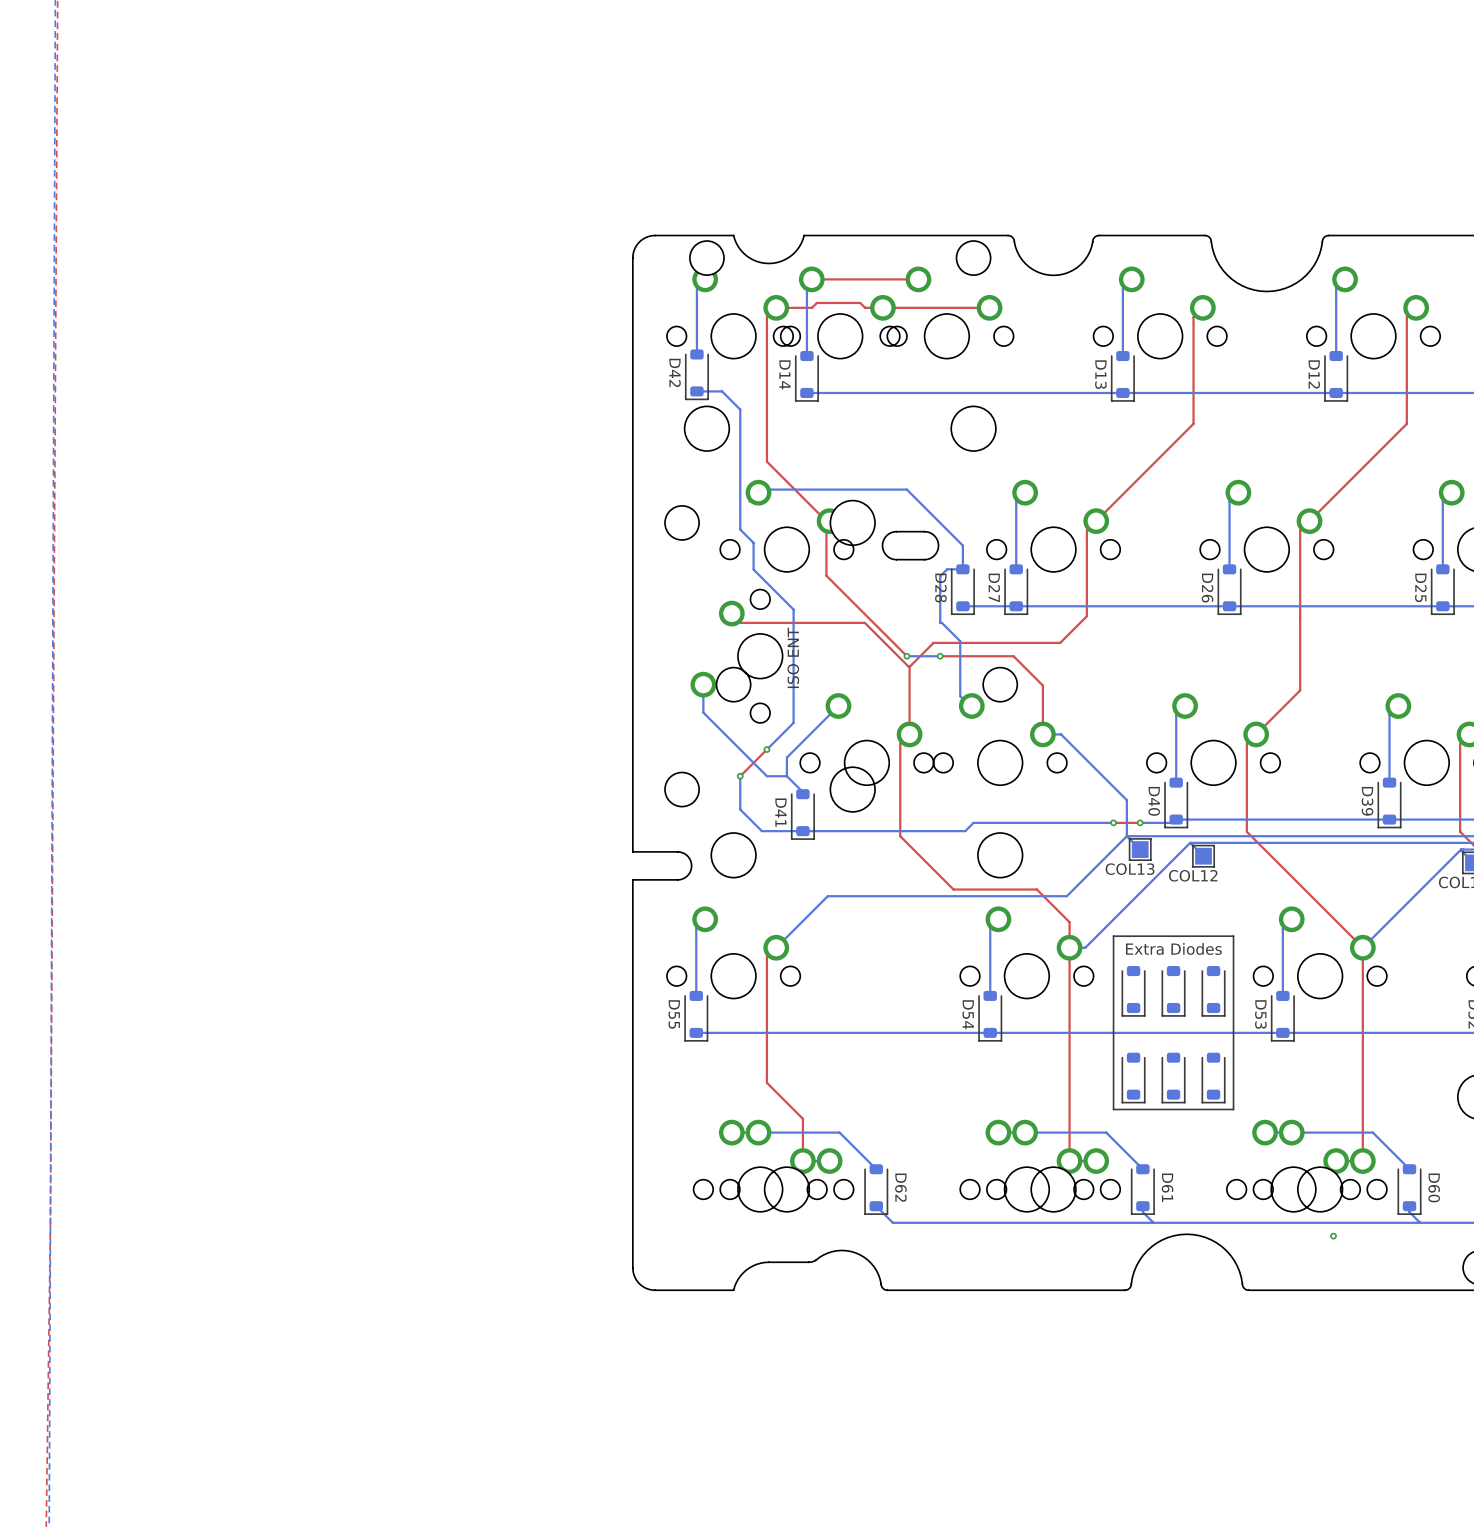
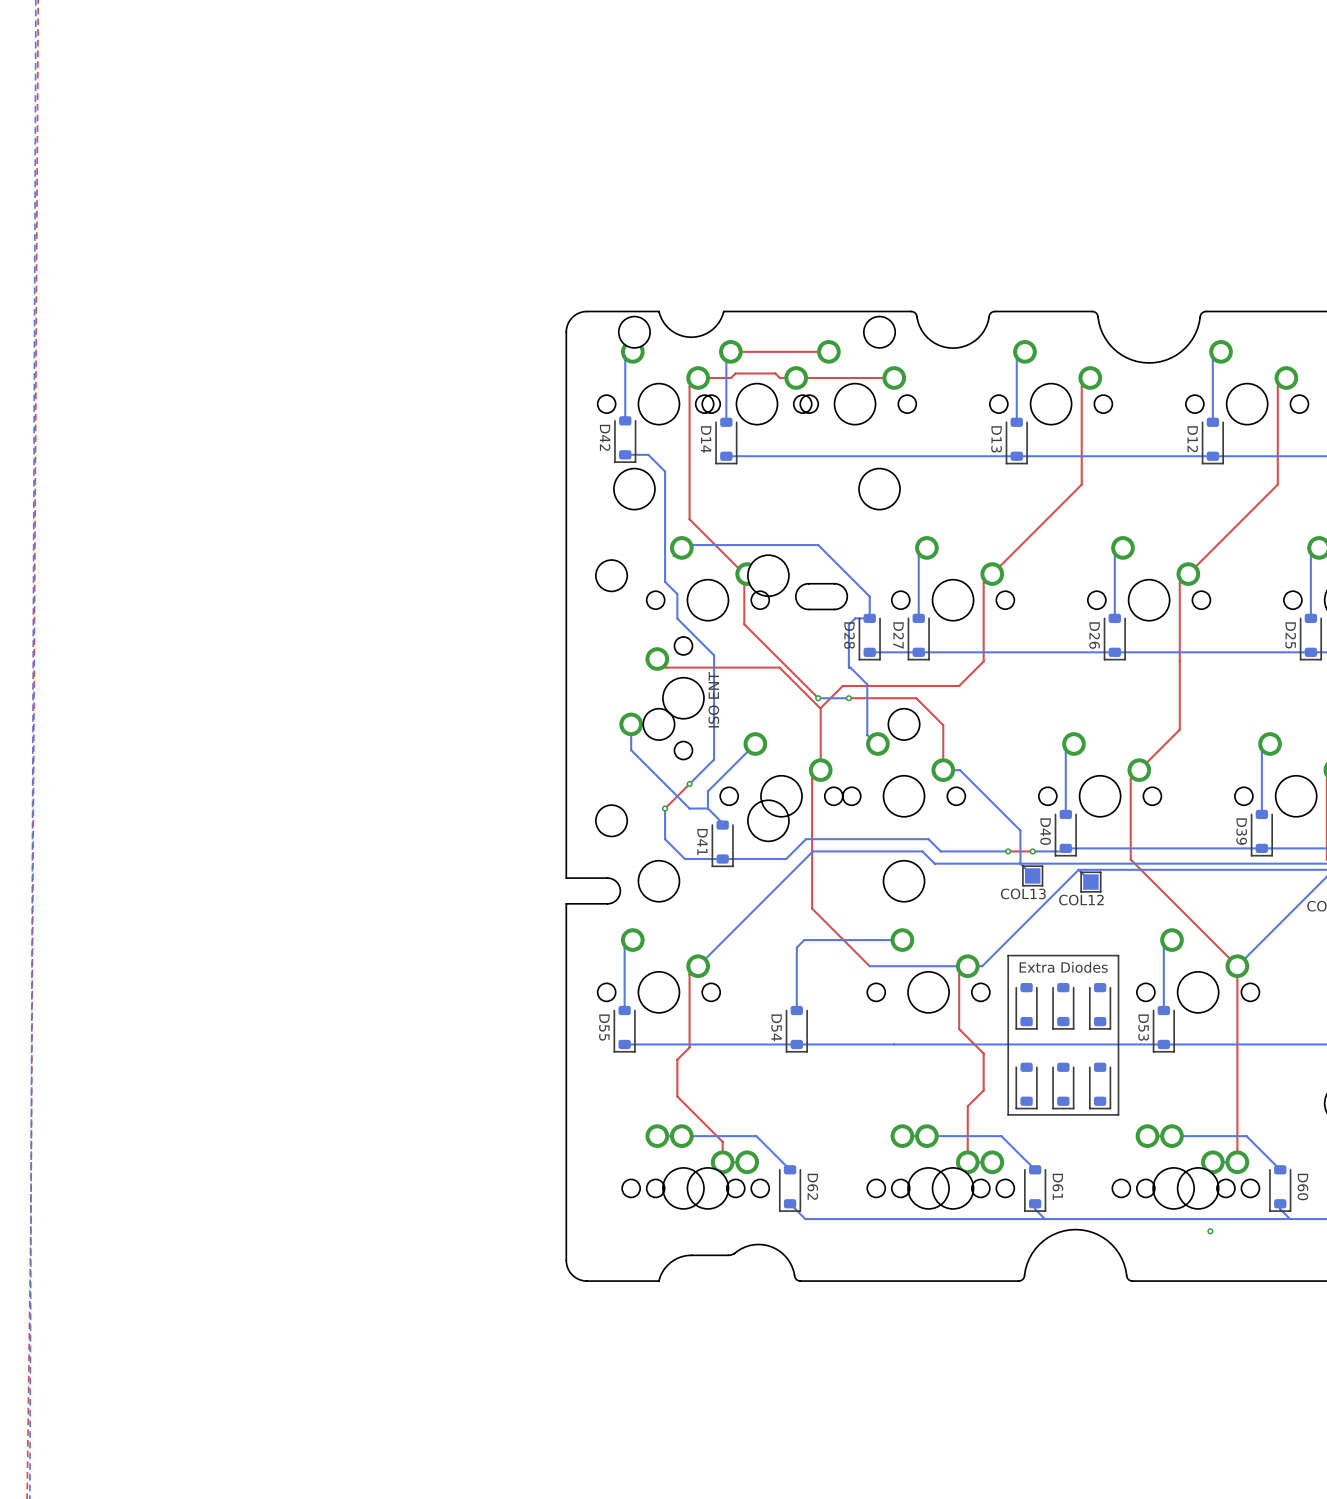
bottom track: (973, 822) (965, 831) (871, 831) -> (940, 851) (928, 839) (806, 839) (786, 859)
bottom track: (1040, 822) (1020, 822) -> (1020, 863) (934, 863) (922, 851)
top track: (900, 836) (953, 889) (1036, 889) (1069, 922) (1069, 1100) -> (812, 863) (812, 908) (869, 966)
bottom track: (1126, 836) (1066, 896) (827, 896) -> (879, 851) (812, 851) (745, 918)
bottom track: (998, 919) (990, 927) (990, 995) -> (902, 940) (804, 940) (796, 947) (796, 1010)
top track: none -> (967, 966) (959, 974) (959, 1029) (983, 1053) (983, 1090) (967, 1106)
bottom track: none -> (967, 966) (869, 966)
D54 position: (990, 1016) -> (796, 1029)
top track: (766, 1036) (766, 1082) (802, 1118) (802, 1138) -> (689, 1047) (677, 1059) (677, 1096) (722, 1141)

